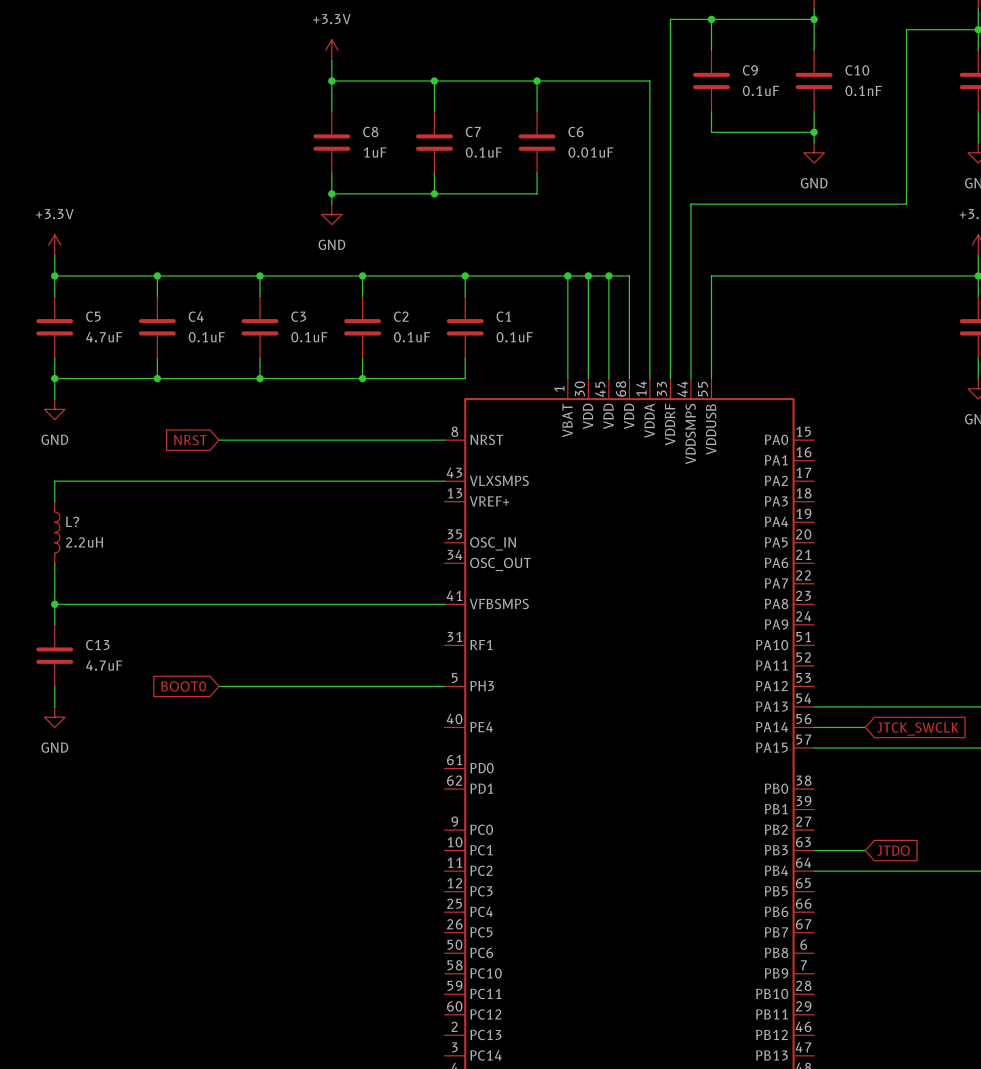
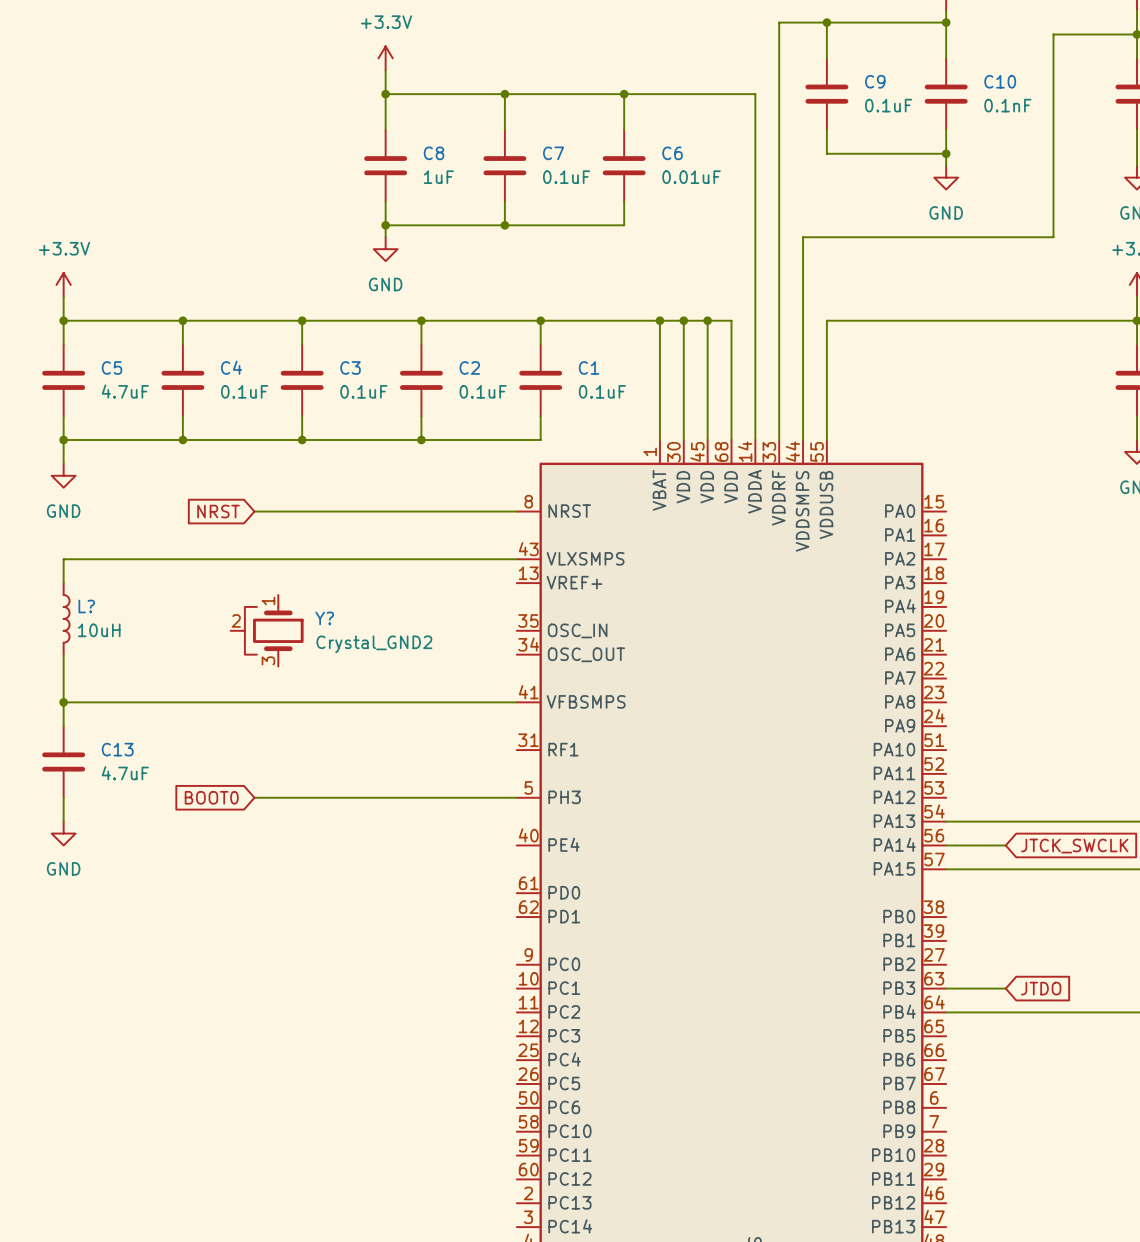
L? value: 2.2uH (84, 542) -> 10uH (99, 630)
Y?: none -> Crystal_GND2 (267, 630)

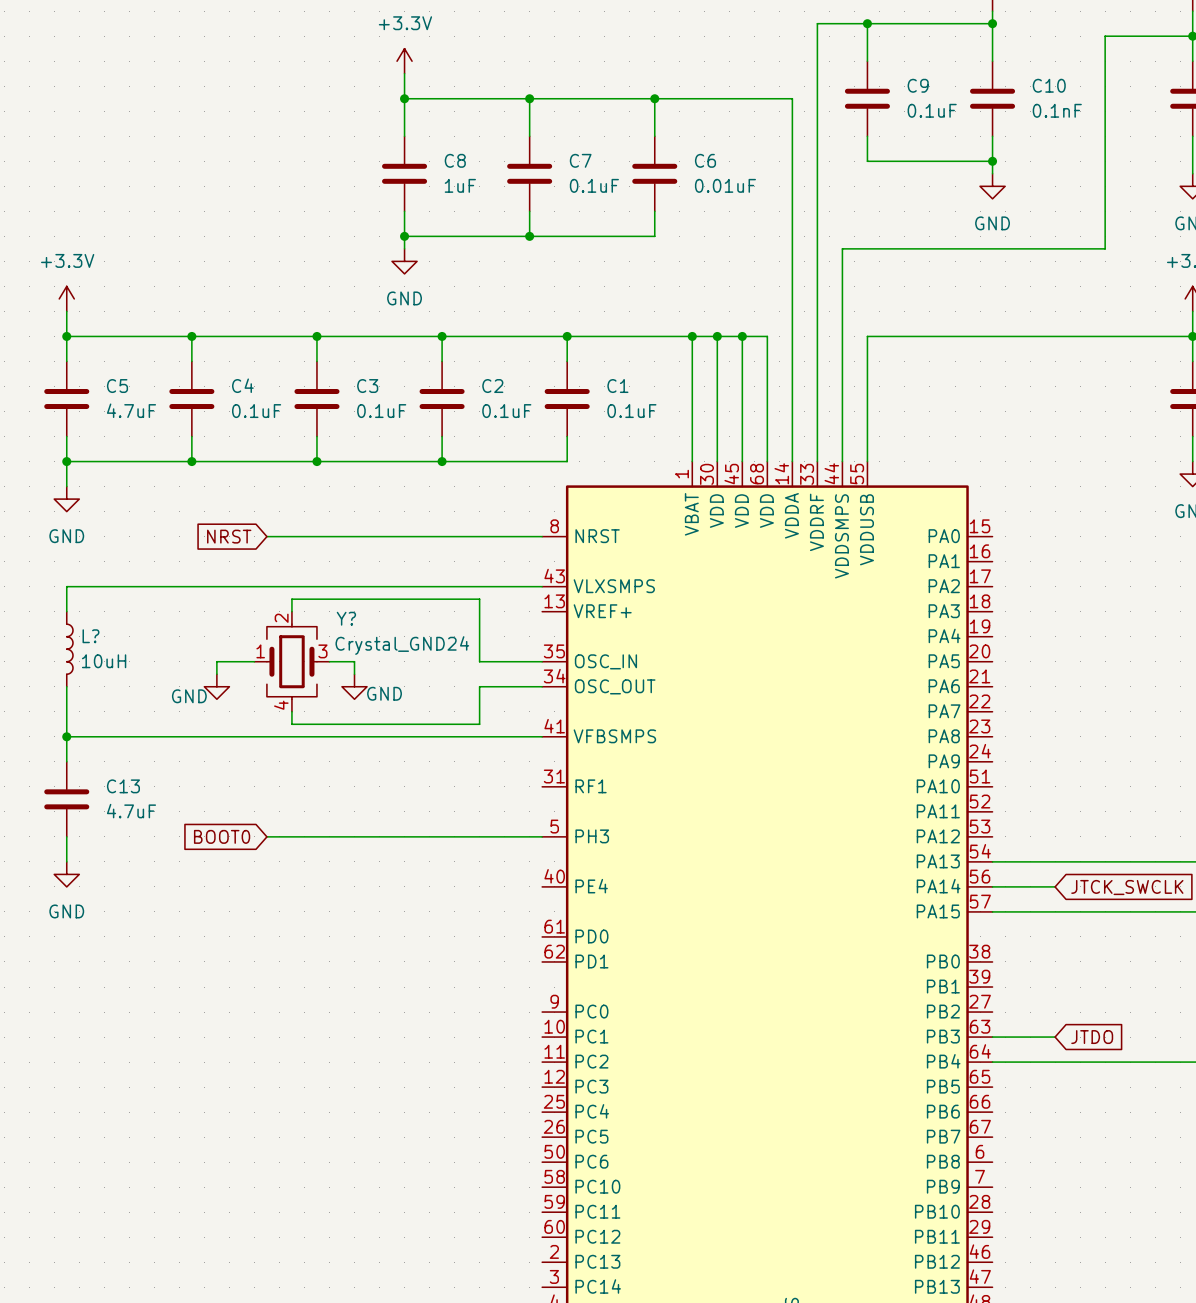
wire: none -> (291, 611) (291, 599) (479, 599) (479, 661) (542, 661)
wire: none -> (254, 661) (216, 661) (216, 674)
Y?: Crystal_GND2 (267, 630) -> none
Y?: none -> Crystal_GND24 (291, 661)
wire: none -> (329, 661) (354, 661) (354, 674)
power symbol: none -> GND (216, 686)
power symbol: none -> GND (354, 686)
wire: none -> (542, 686) (479, 686) (479, 724) (291, 724) (291, 711)

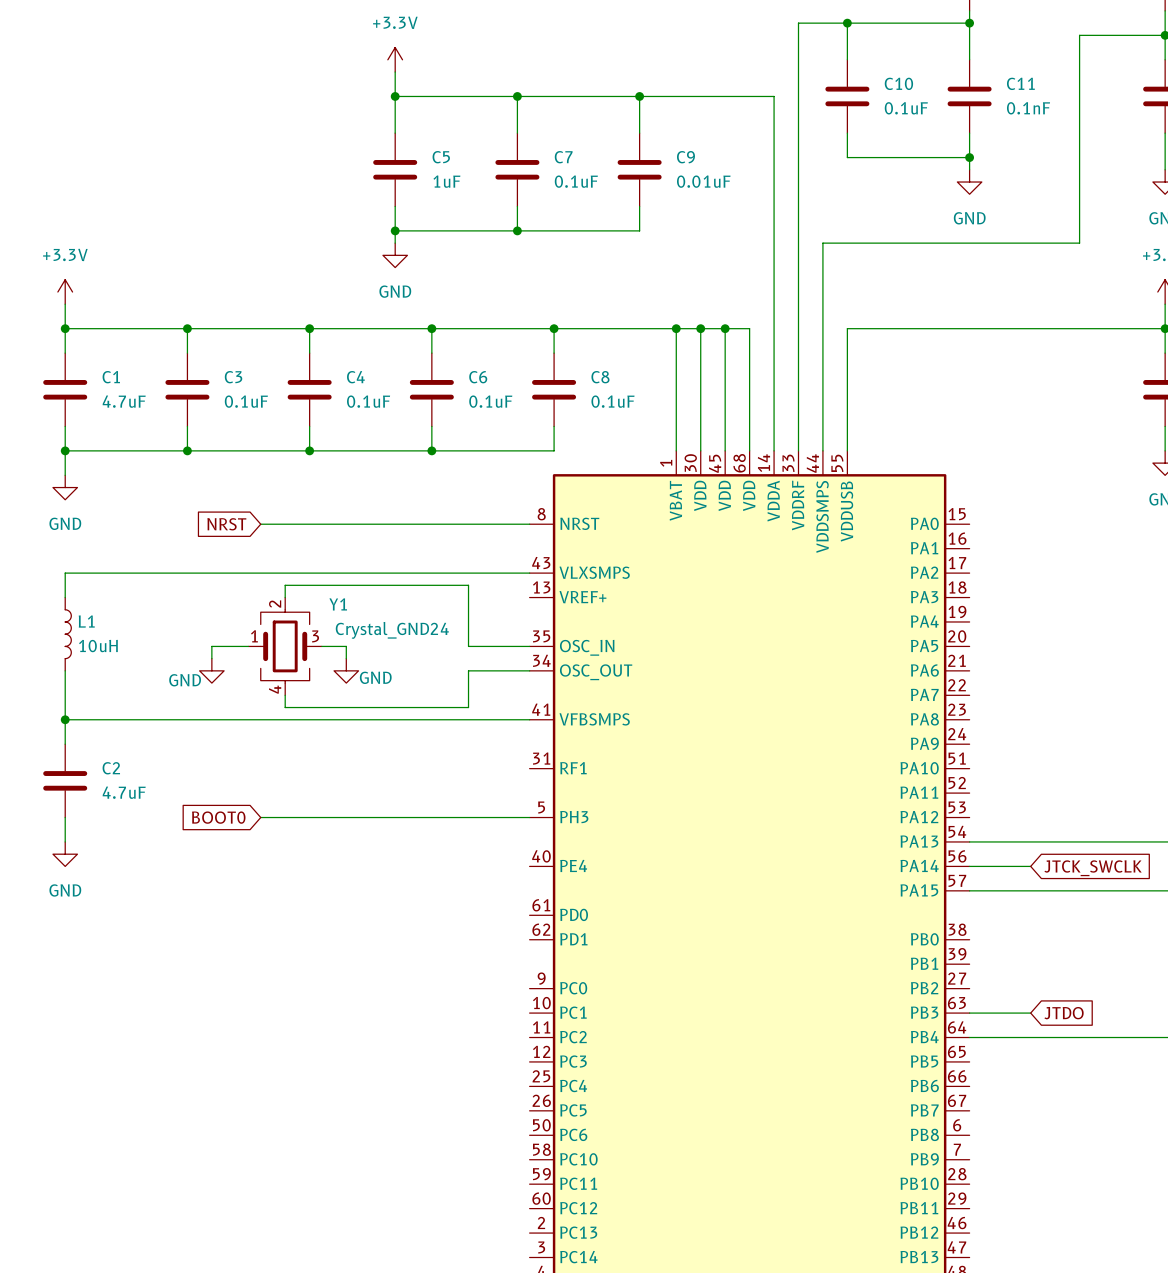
C9 name: C9 (918, 85) -> C10 (898, 83)
C10 name: C10 (1049, 85) -> C11 (1020, 83)
C8 name: C8 (455, 160) -> C5 (441, 157)
C6 name: C6 (705, 160) -> C9 (685, 157)
C4 name: C4 (242, 385) -> C3 (233, 377)
C5 name: C5 (117, 386) -> C1 (111, 377)
C3 name: C3 (367, 386) -> C4 (355, 377)
C2 name: C2 (492, 386) -> C6 (478, 377)
C1 name: C1 (617, 386) -> C8 (600, 377)
Y? name: Y? (346, 618) -> Y1 (338, 604)
L? name: L? (90, 636) -> L1 (86, 621)
C13 name: C13 (123, 786) -> C2 (111, 768)

